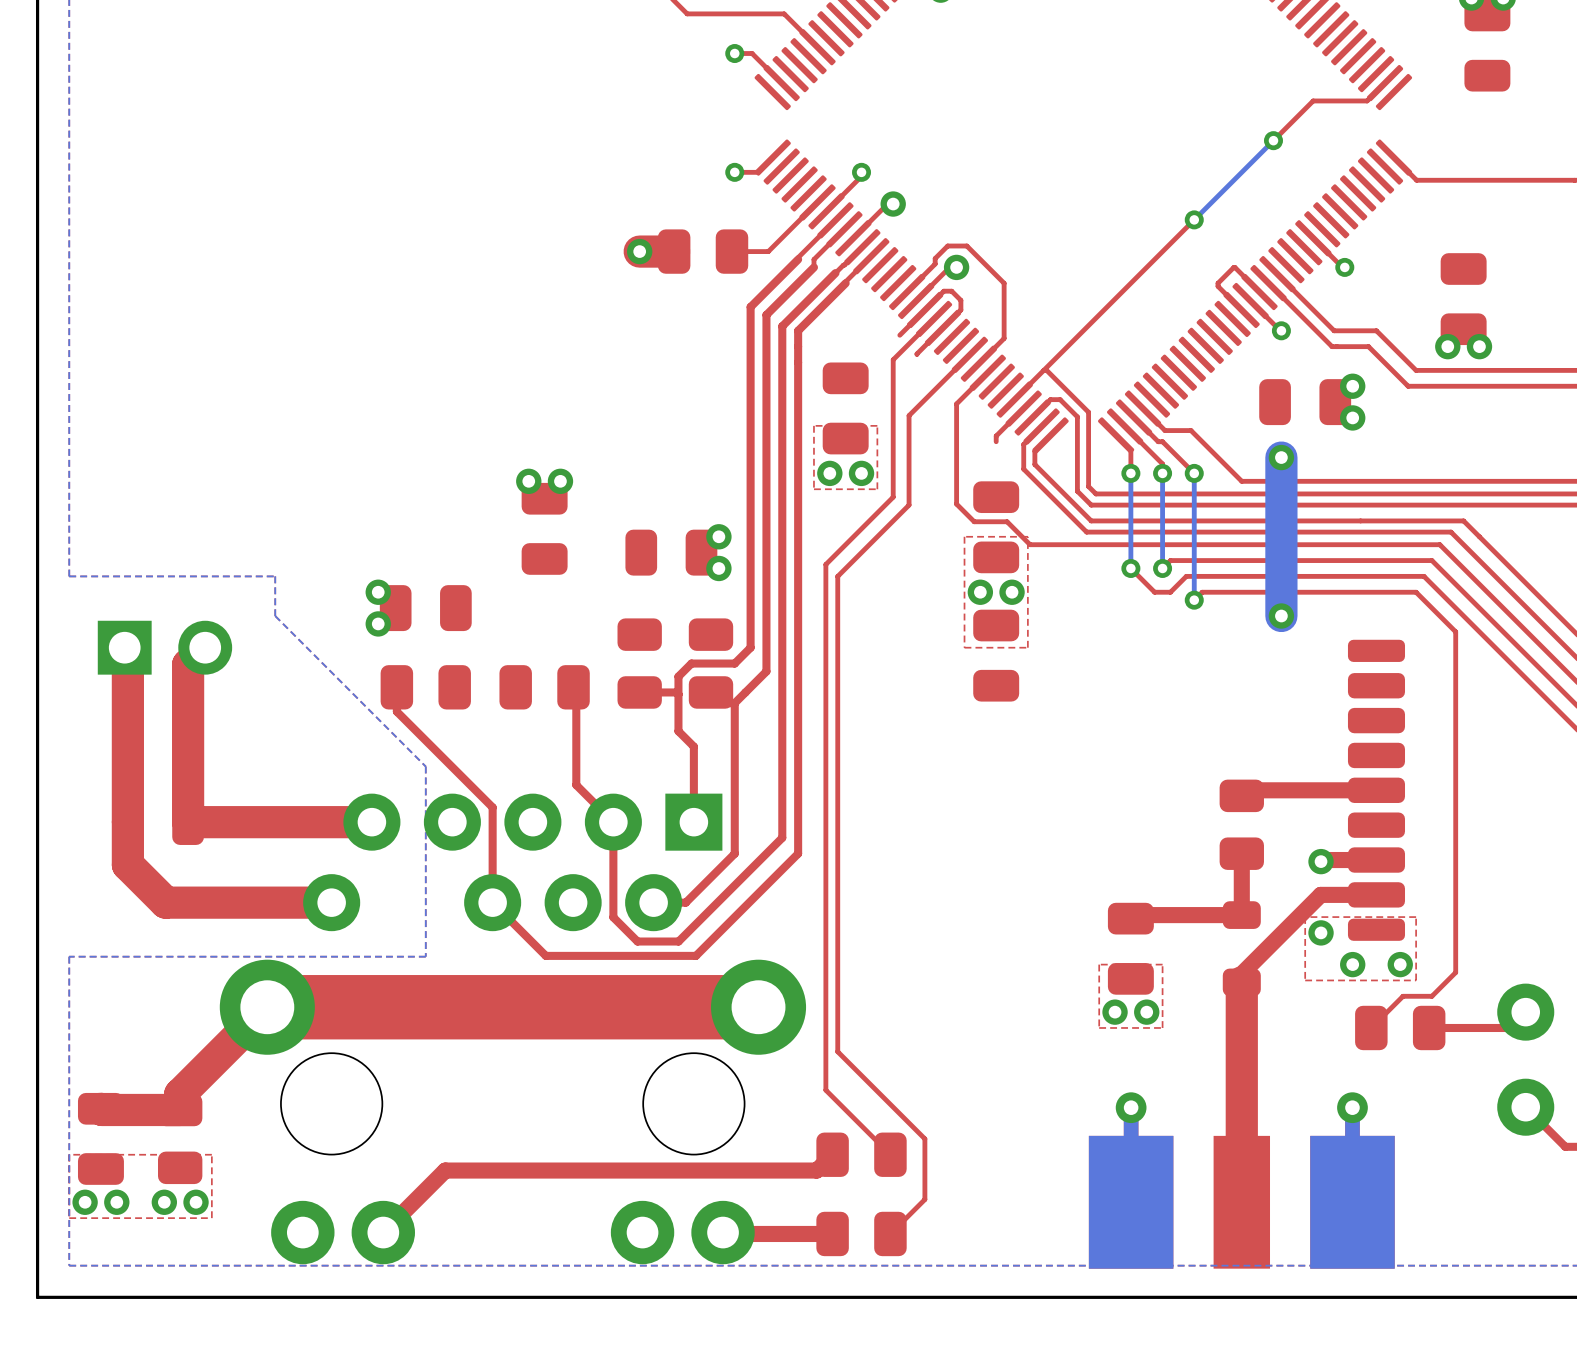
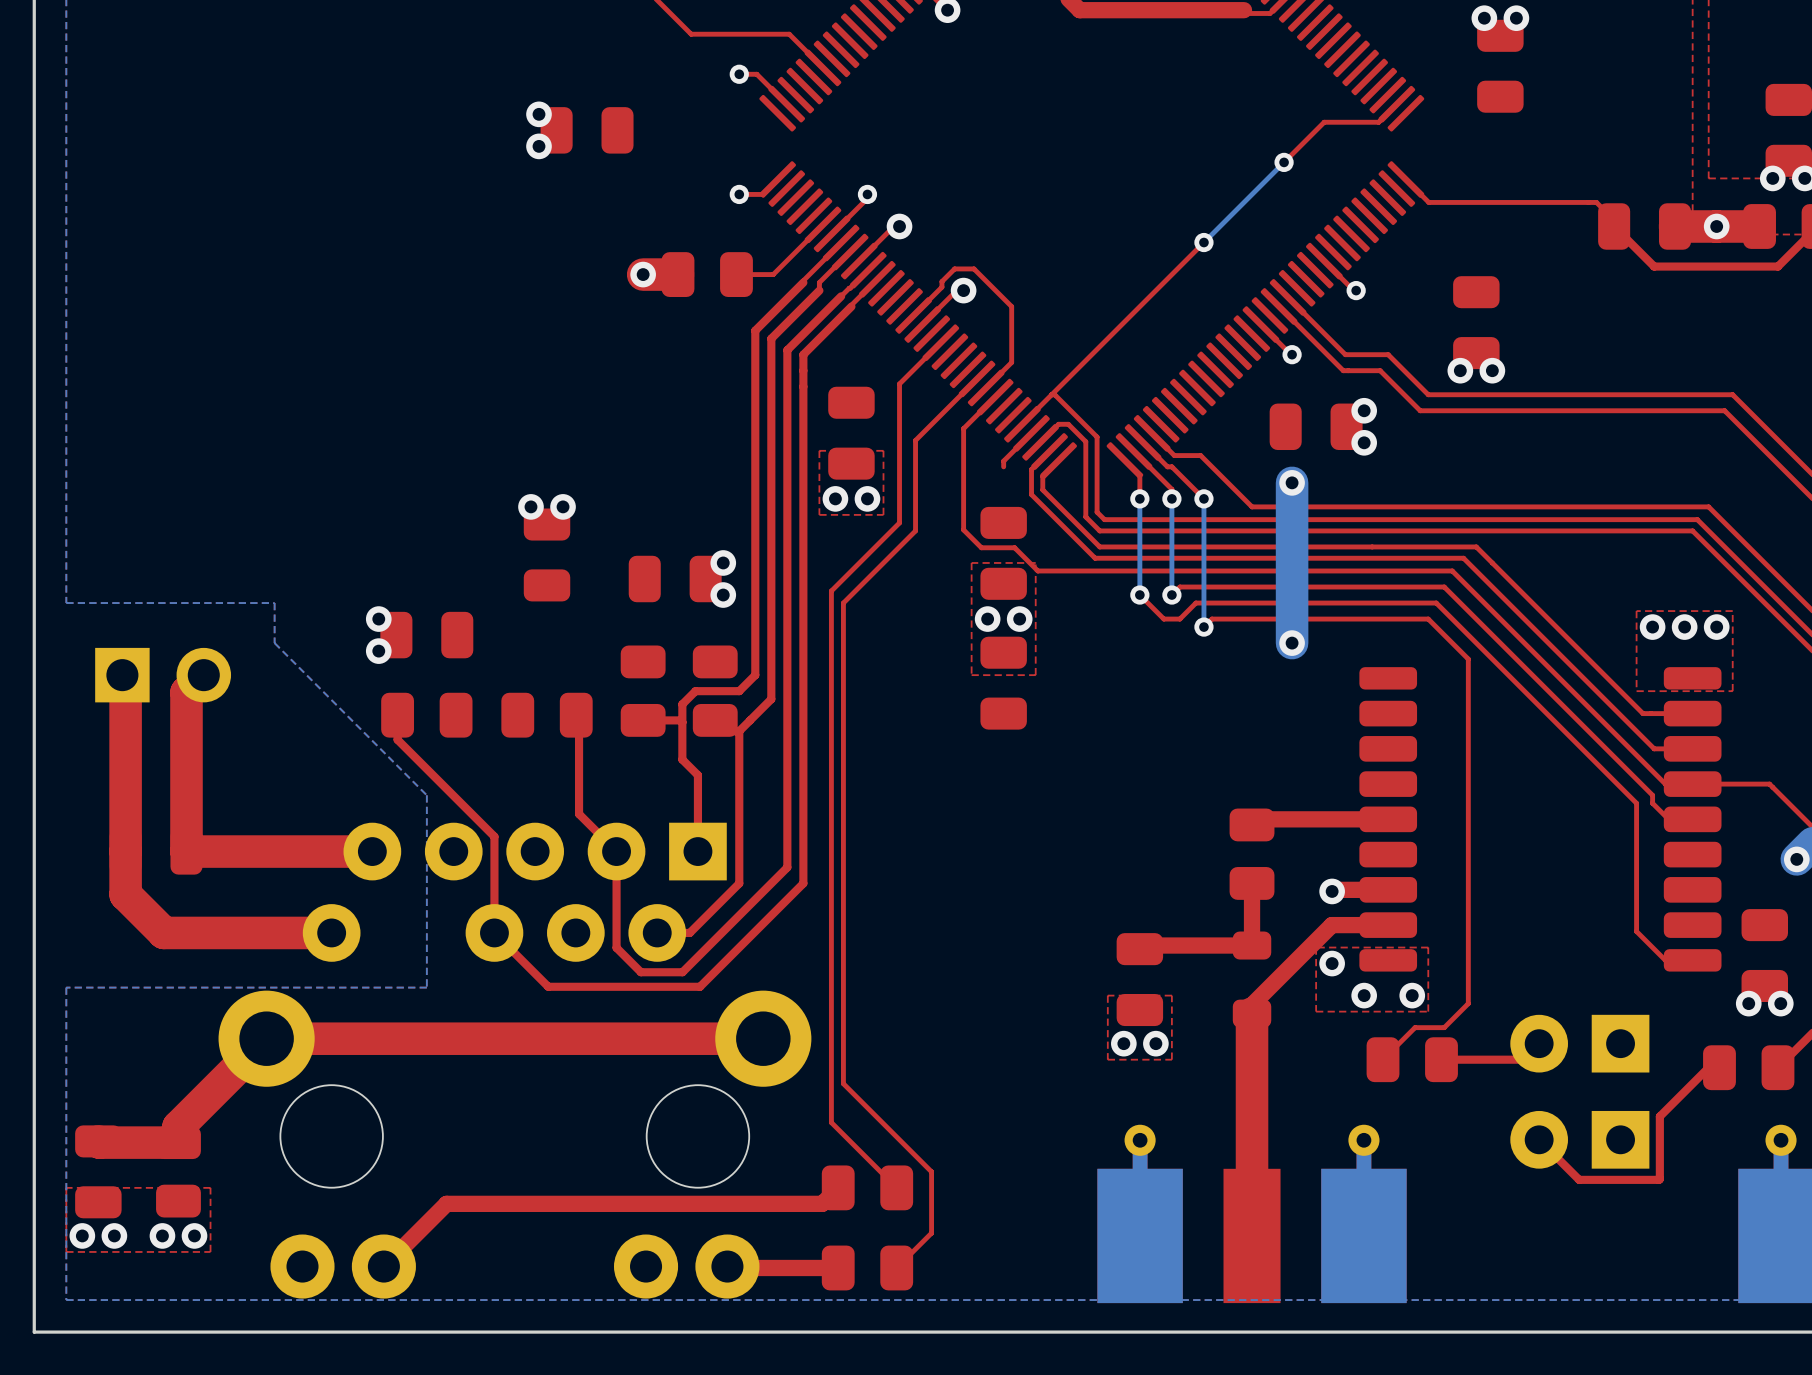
via: none -> (539, 114)
part: none -> (587, 130)
via: none -> (539, 146)
top track: (1259, 292) (1234, 267) (1218, 283) (1218, 286) (1241, 309) -> none
top track: (899, 335) (943, 291) (951, 291) (960, 300) (960, 310) (916, 354) -> none
top track width: thick (758, 1007) (267, 1007) -> thin (763, 1038) (266, 1038)

